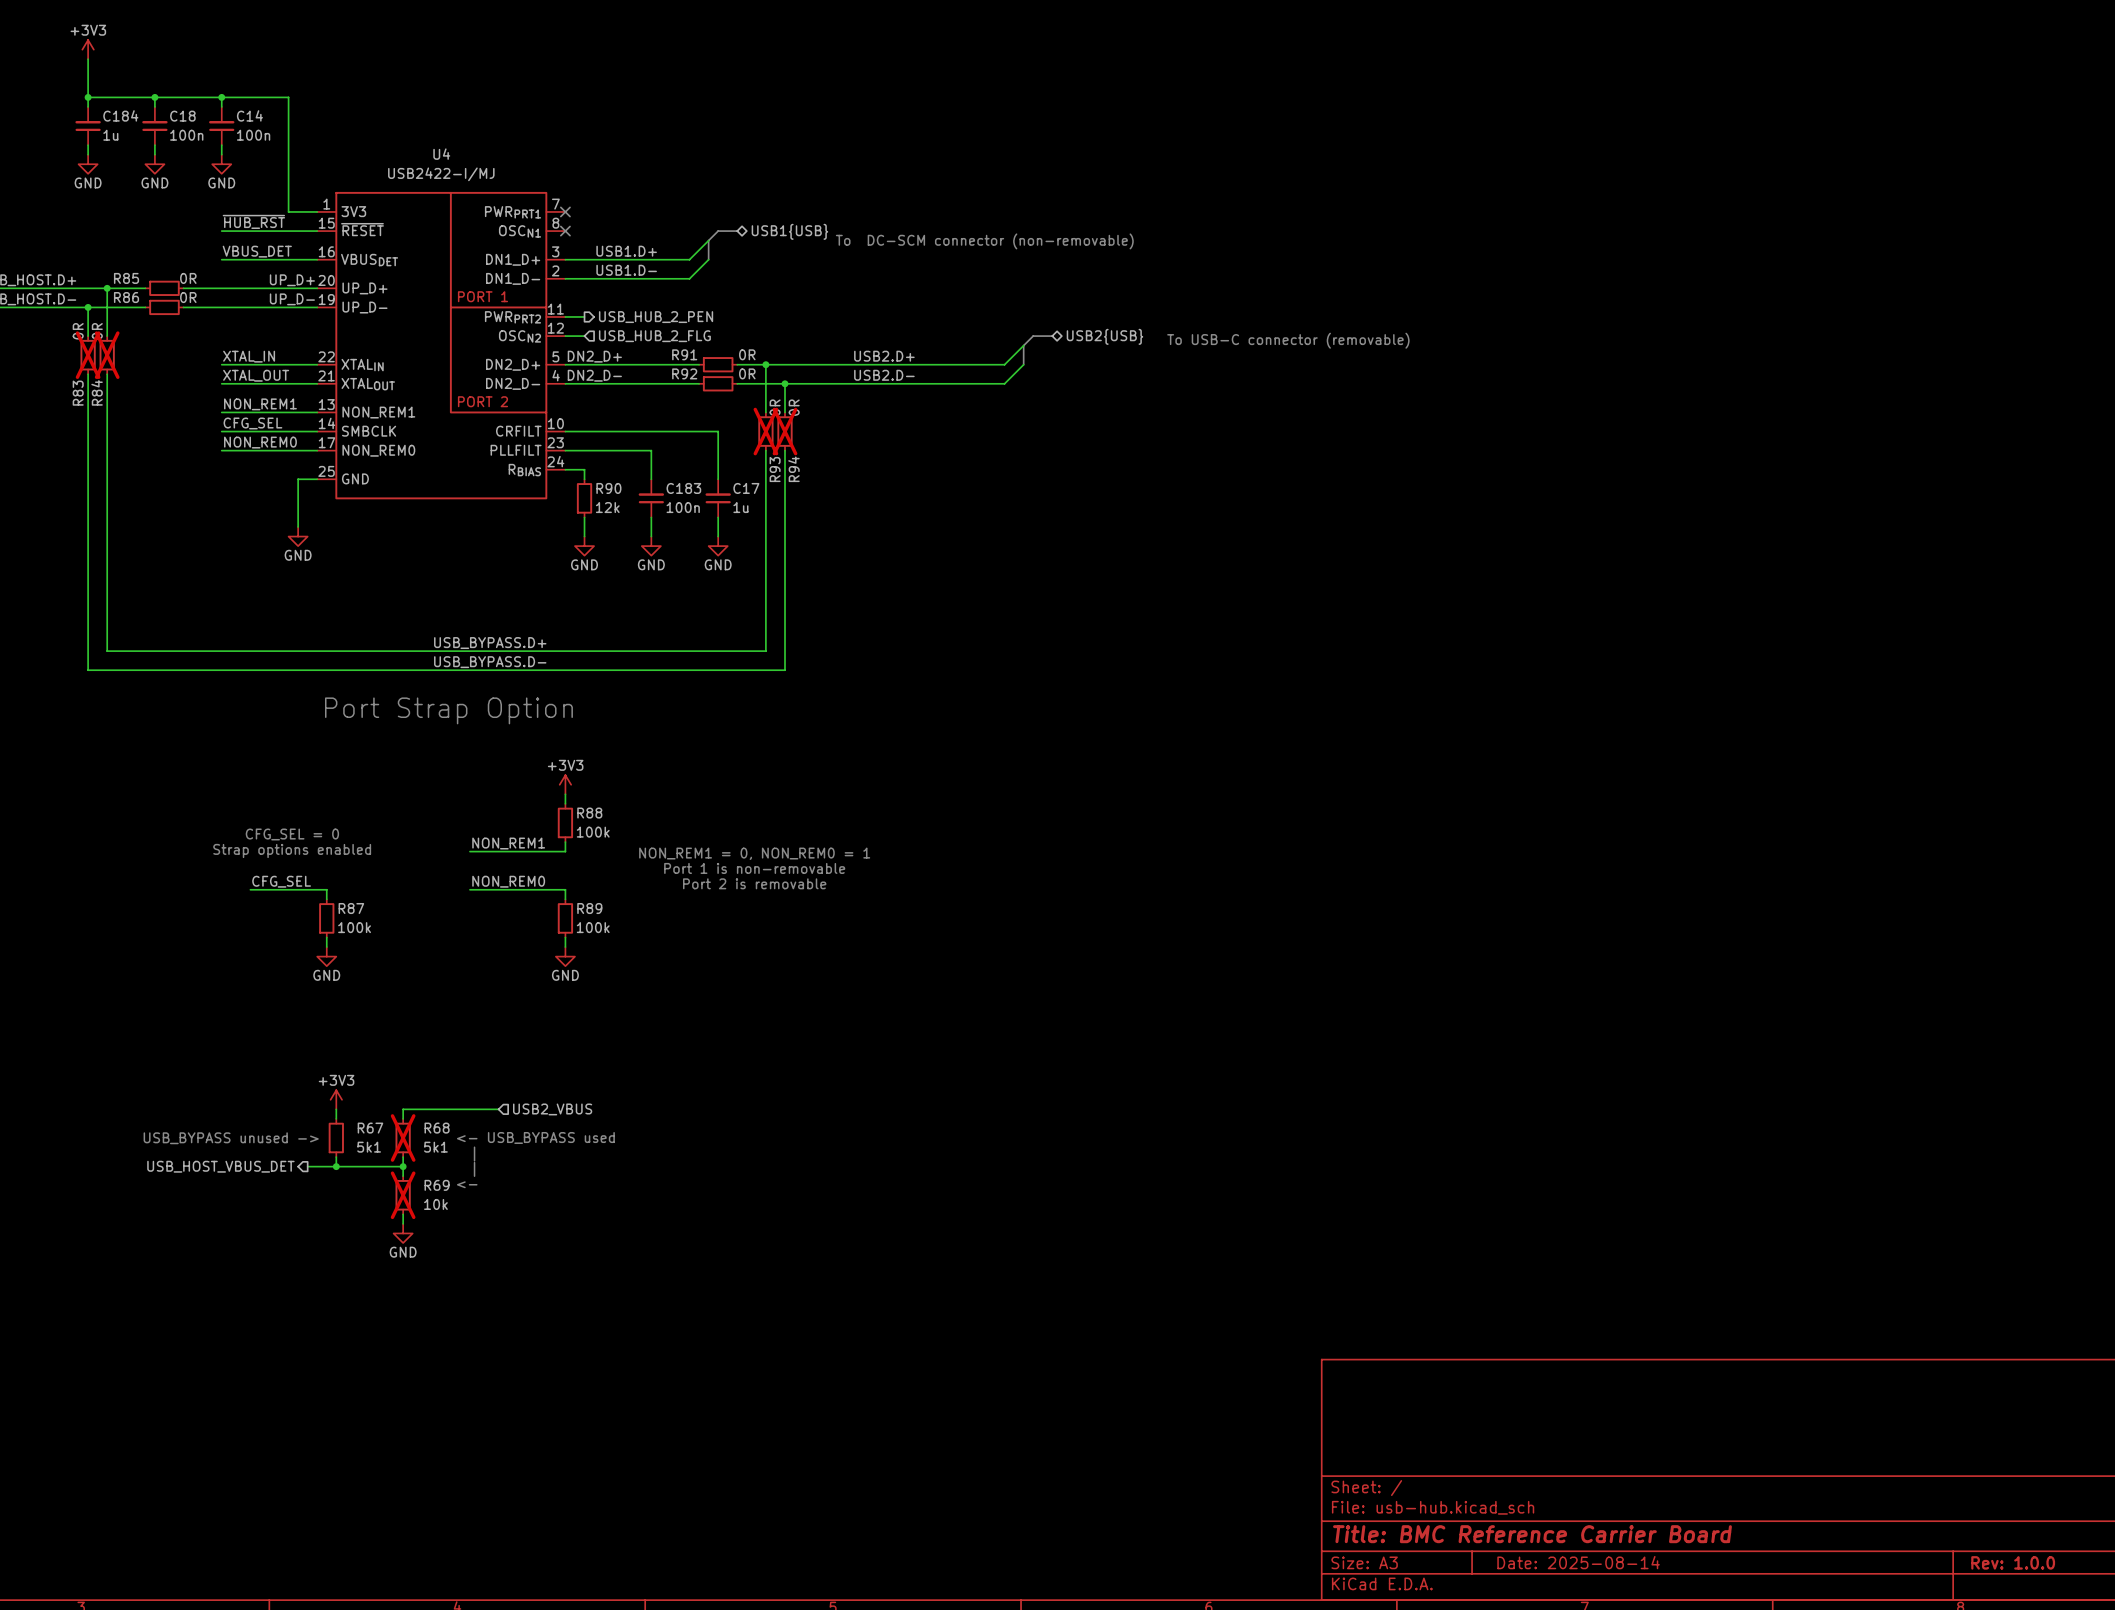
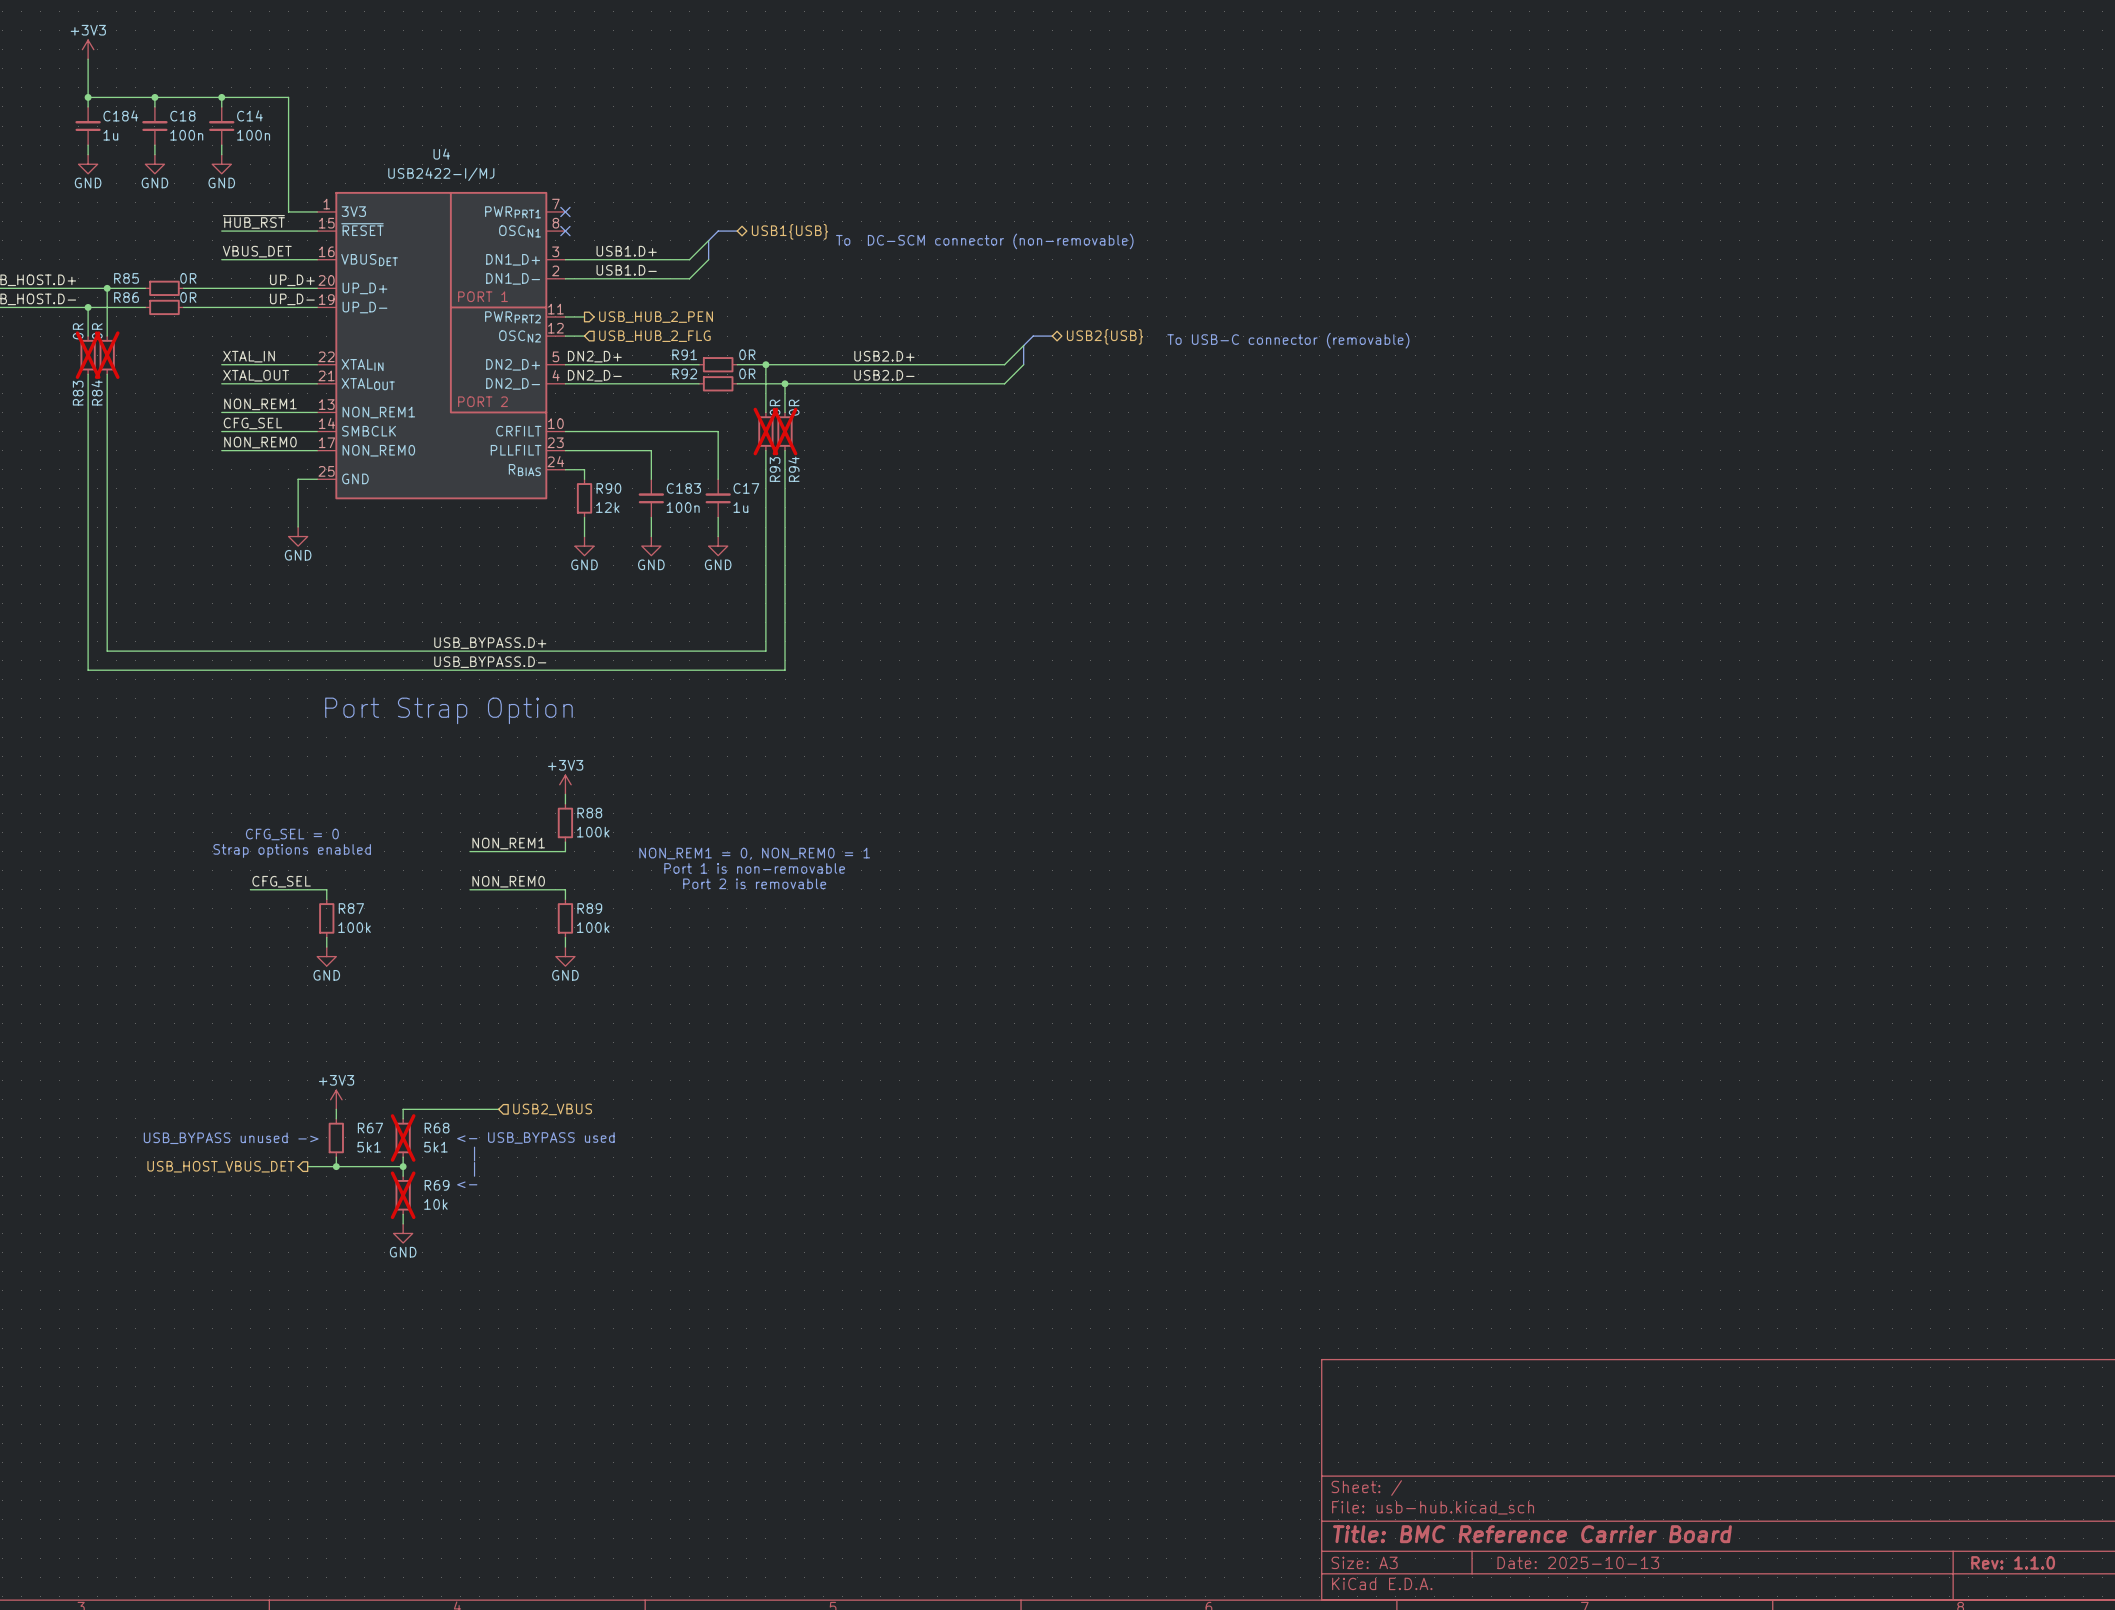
title block: Date: 2025-08-14 (1578, 1562) -> Date: 2025-10-13 (1578, 1562)
title block: Rev: 1.0.0 (2013, 1562) -> Rev: 1.1.0 (2013, 1562)

